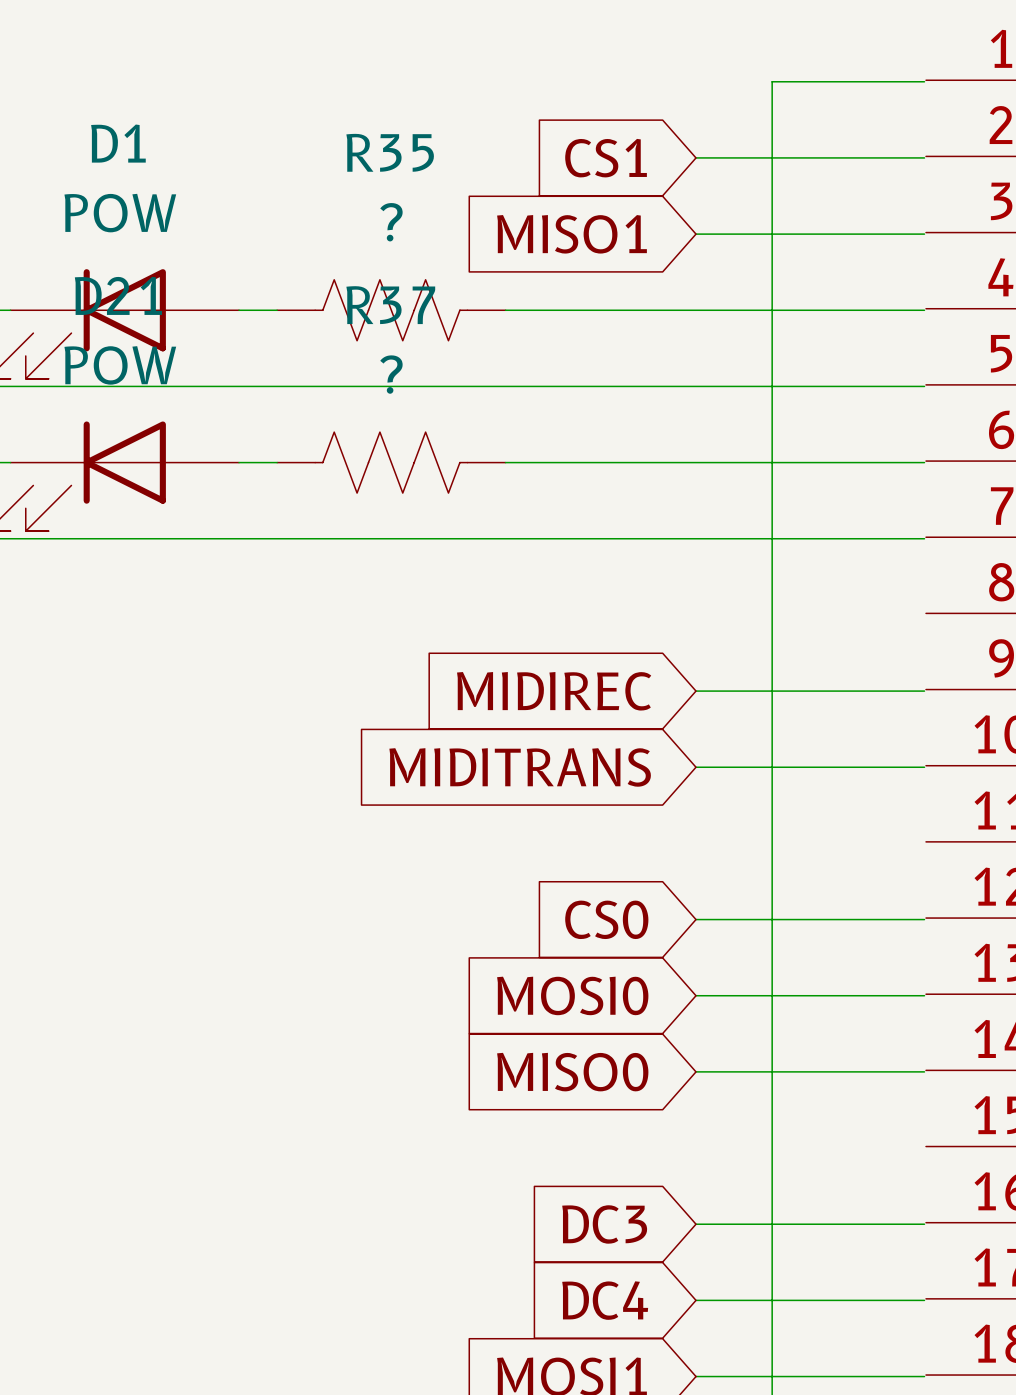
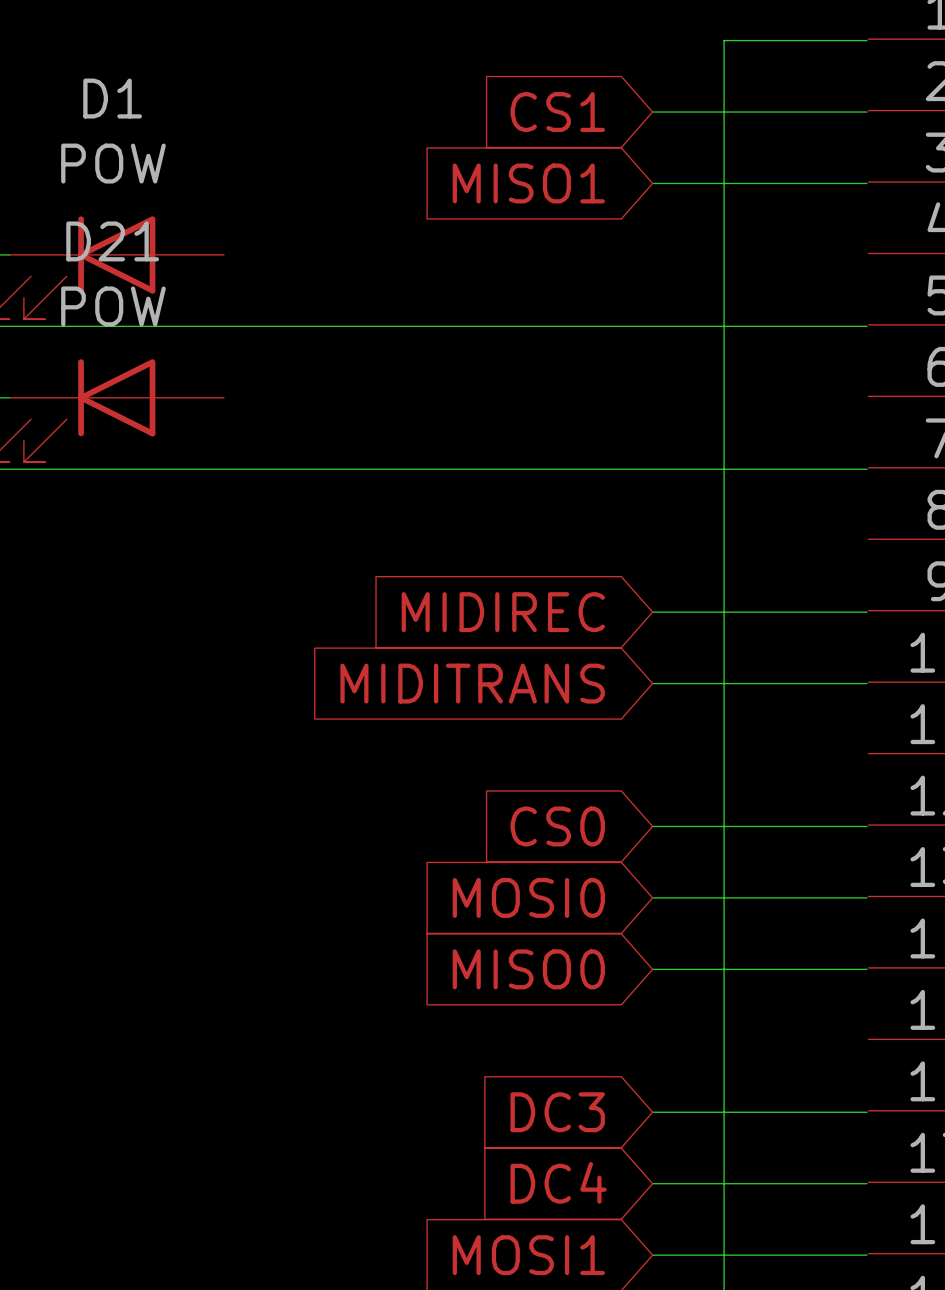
wire: (239, 310) (277, 310) -> none
R35: ? (391, 310) -> none
wire: (505, 310) (924, 310) -> none
wire: (239, 462) (277, 462) -> none
R37: ? (391, 462) -> none
wire: (505, 462) (924, 462) -> none

